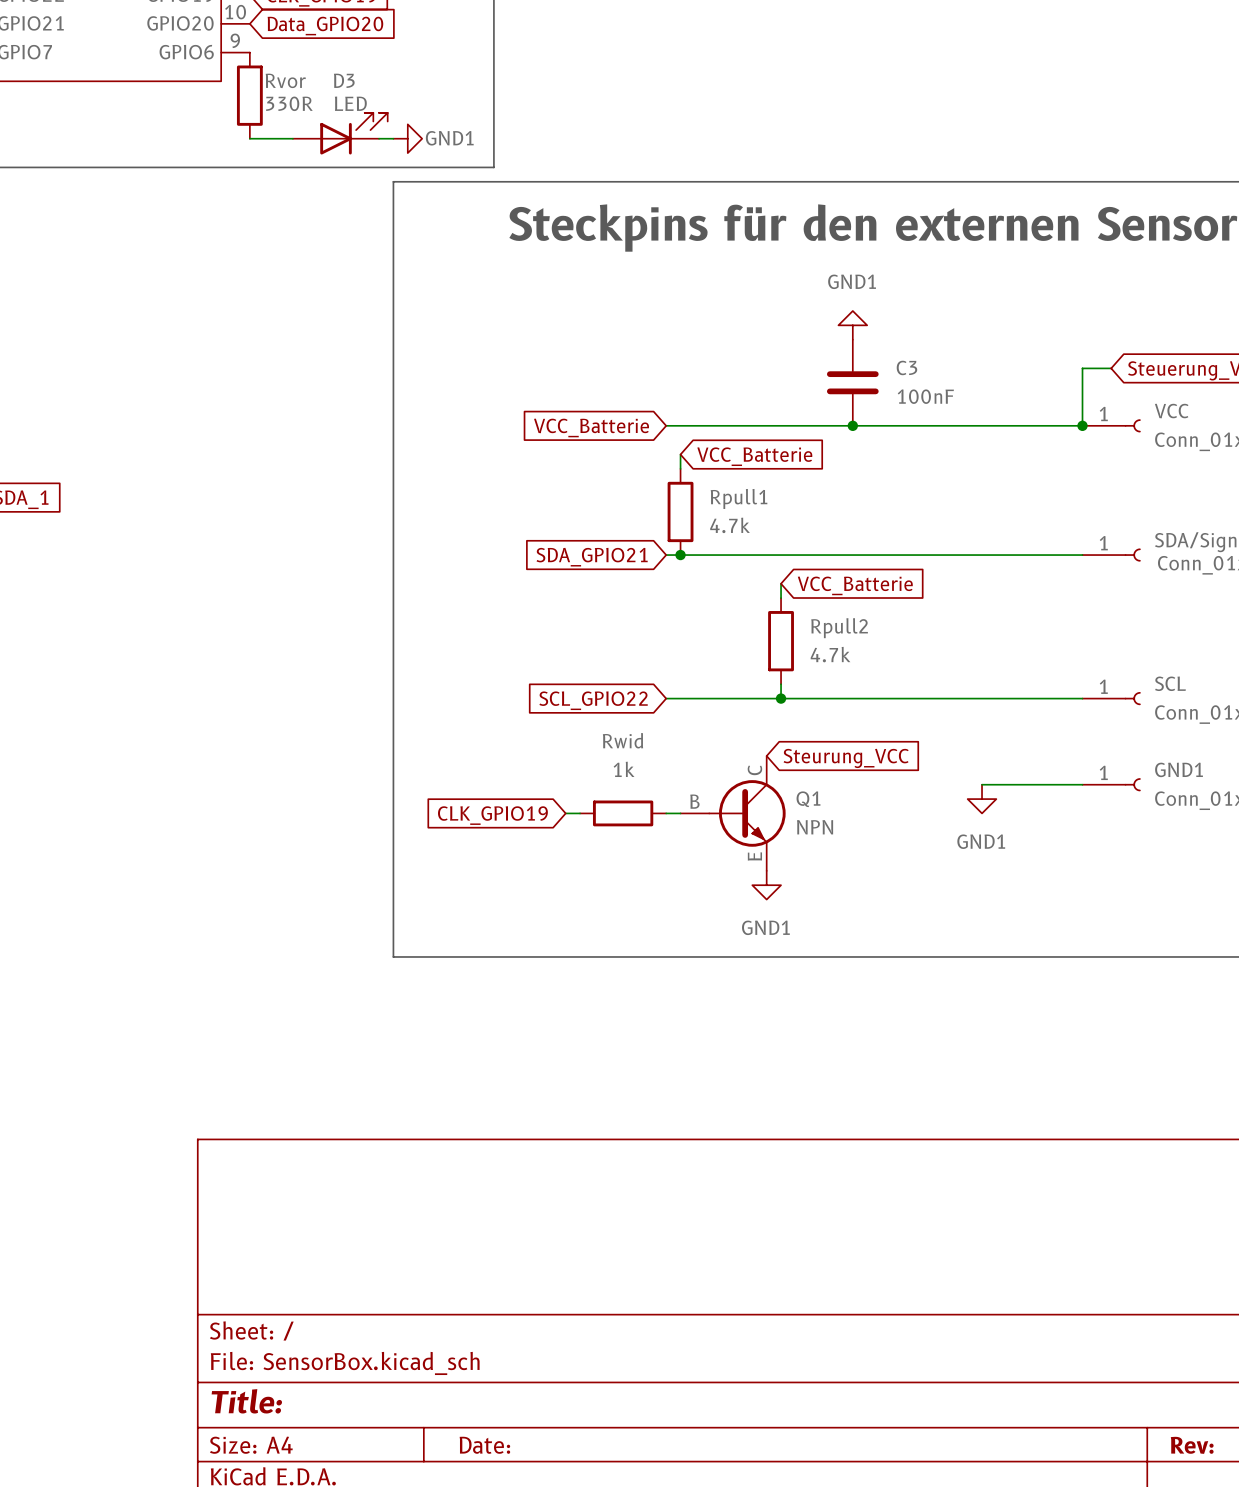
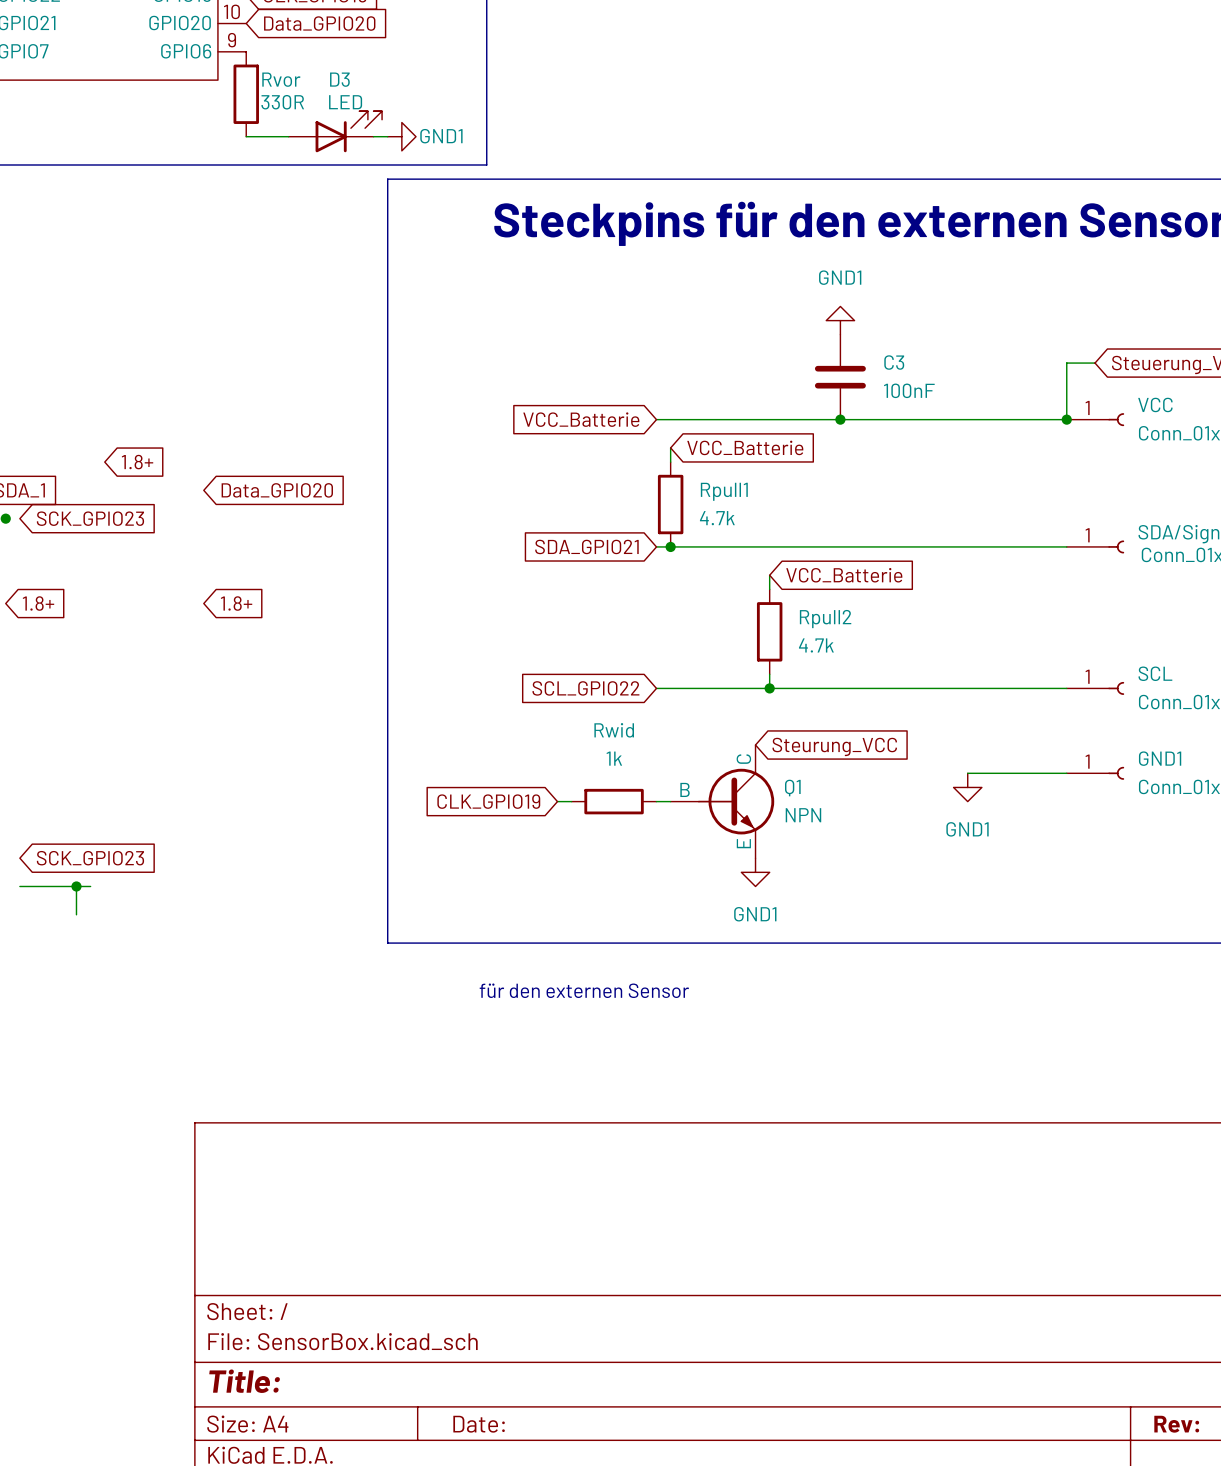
global label: none -> 1.8+ (137, 462)
global label: none -> Data_GPIO20 (277, 490)
junction: none -> (5, 518)
global label: none -> SCK_GPIO23 (90, 518)
global label: none -> 1.8+ (38, 603)
global label: none -> 1.8+ (236, 603)
global label: none -> SCK_GPIO23 (90, 858)
wire: none -> (19, 886) (90, 886)
wire: none -> (76, 886) (76, 914)
junction: none -> (76, 886)
text: none -> für den externen Sensor (584, 990)

